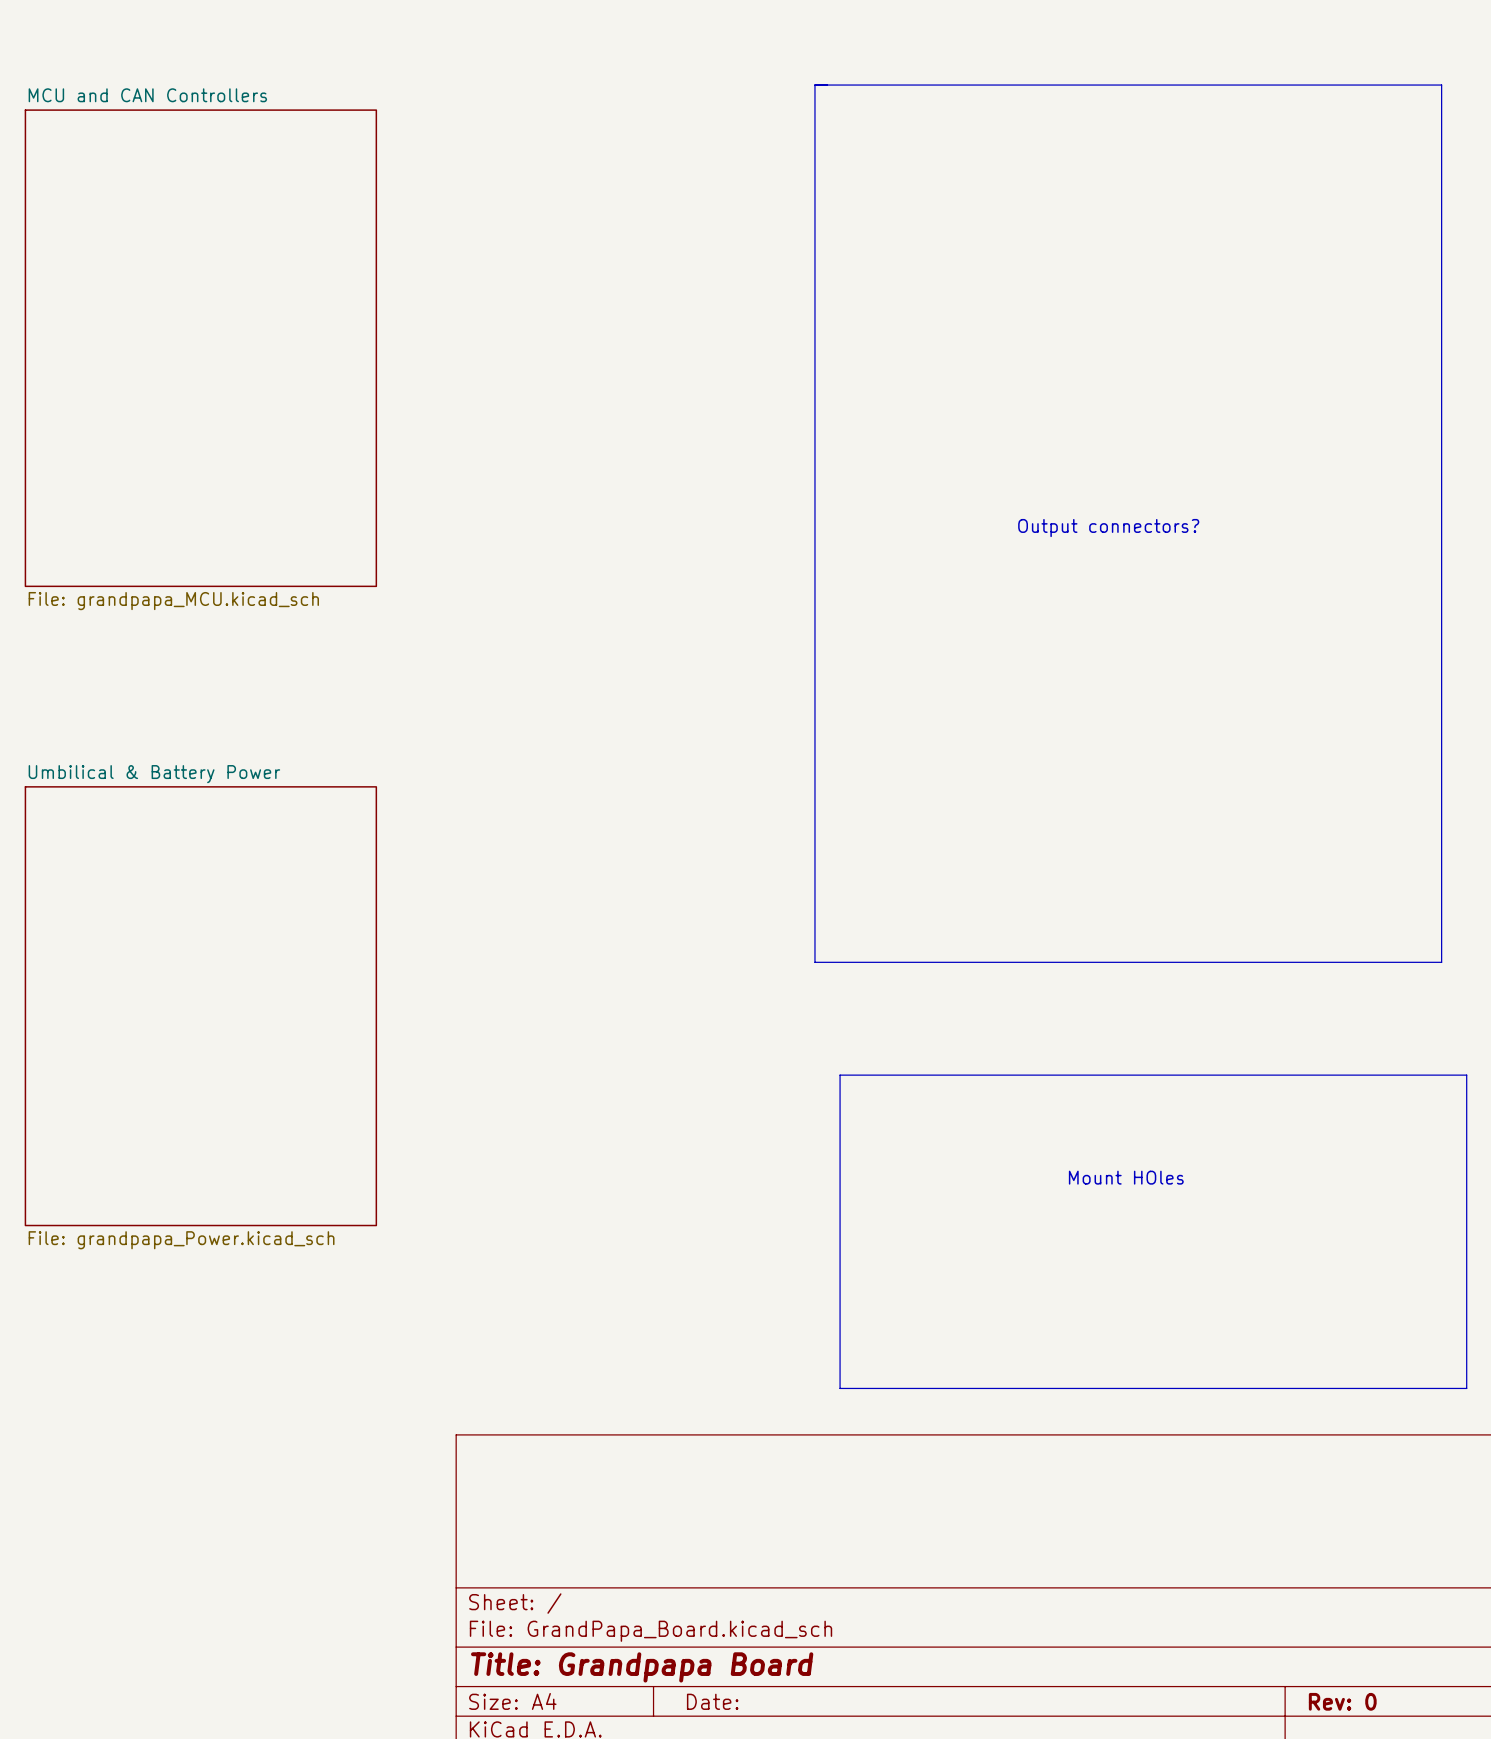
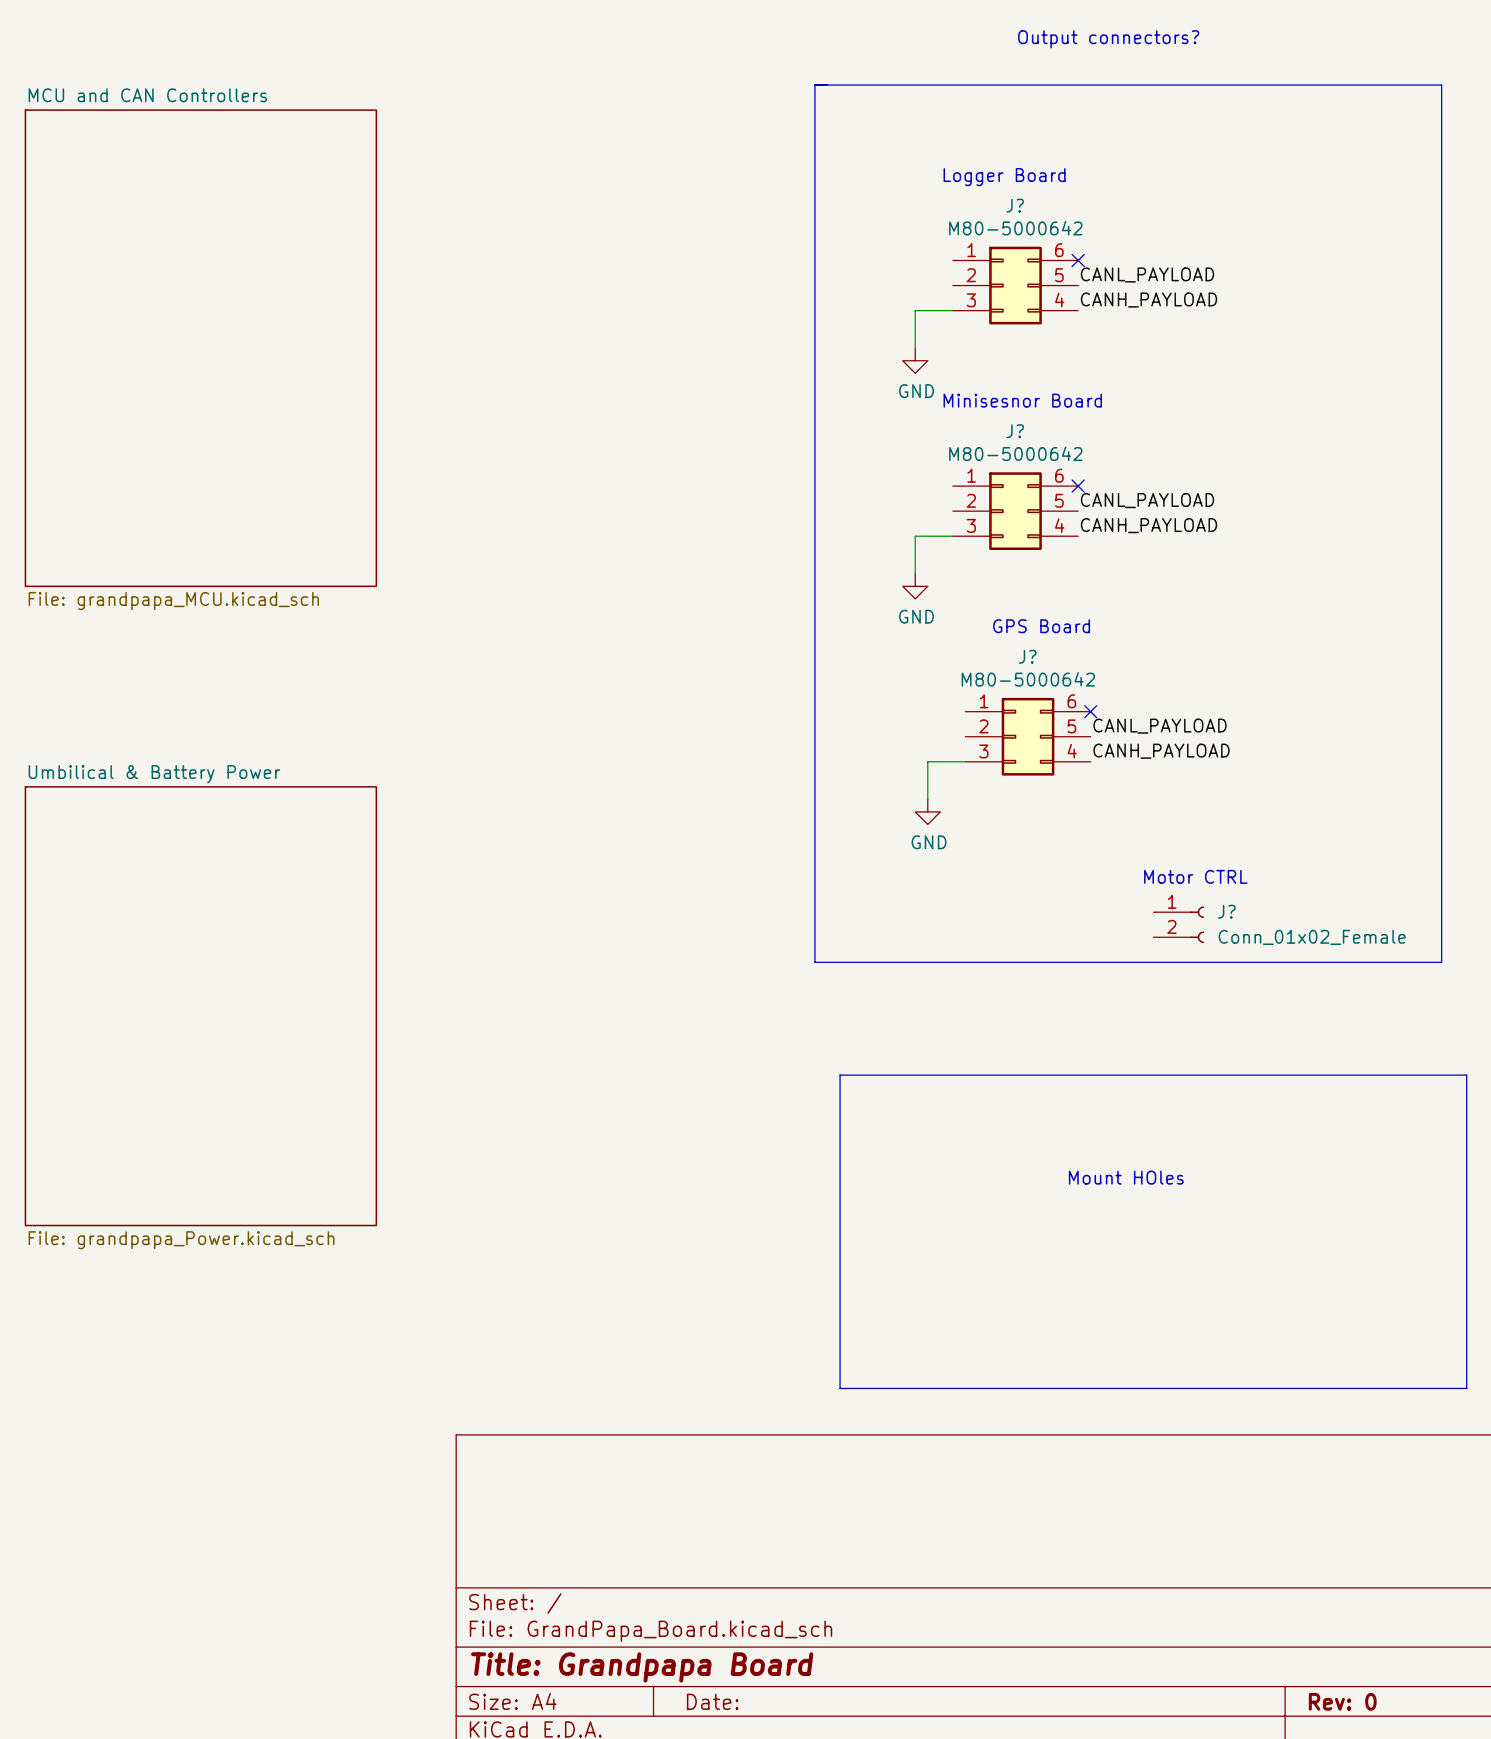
text: none -> Output connectors? (1108, 39)
text: none -> Logger Board (1004, 177)
no-connect mark: none -> (1078, 260)
label: none -> CANL_PAYLOAD (1147, 274)
J?: none -> M80-5000642 (1015, 285)
label: none -> CANH_PAYLOAD (1148, 300)
wire: none -> (952, 310) (915, 310) (915, 348)
power symbol: none -> GND (915, 360)
text: none -> Minisesnor Board (1022, 400)
no-connect mark: none -> (1078, 486)
label: none -> CANL_PAYLOAD (1147, 500)
J?: none -> M80-5000642 (1015, 511)
label: none -> CANH_PAYLOAD (1148, 525)
text: Output connectors? (1108, 528) -> none
wire: none -> (952, 536) (915, 536) (915, 573)
power symbol: none -> GND (915, 586)
text: none -> GPS Board (1041, 626)
no-connect mark: none -> (1090, 711)
label: none -> CANL_PAYLOAD (1160, 726)
J?: none -> M80-5000642 (1028, 736)
label: none -> CANH_PAYLOAD (1161, 751)
wire: none -> (965, 761) (927, 761) (927, 799)
power symbol: none -> GND (927, 811)
text: none -> Motor CTRL (1195, 876)
J?: none -> Conn_01x02_Female (1178, 924)

